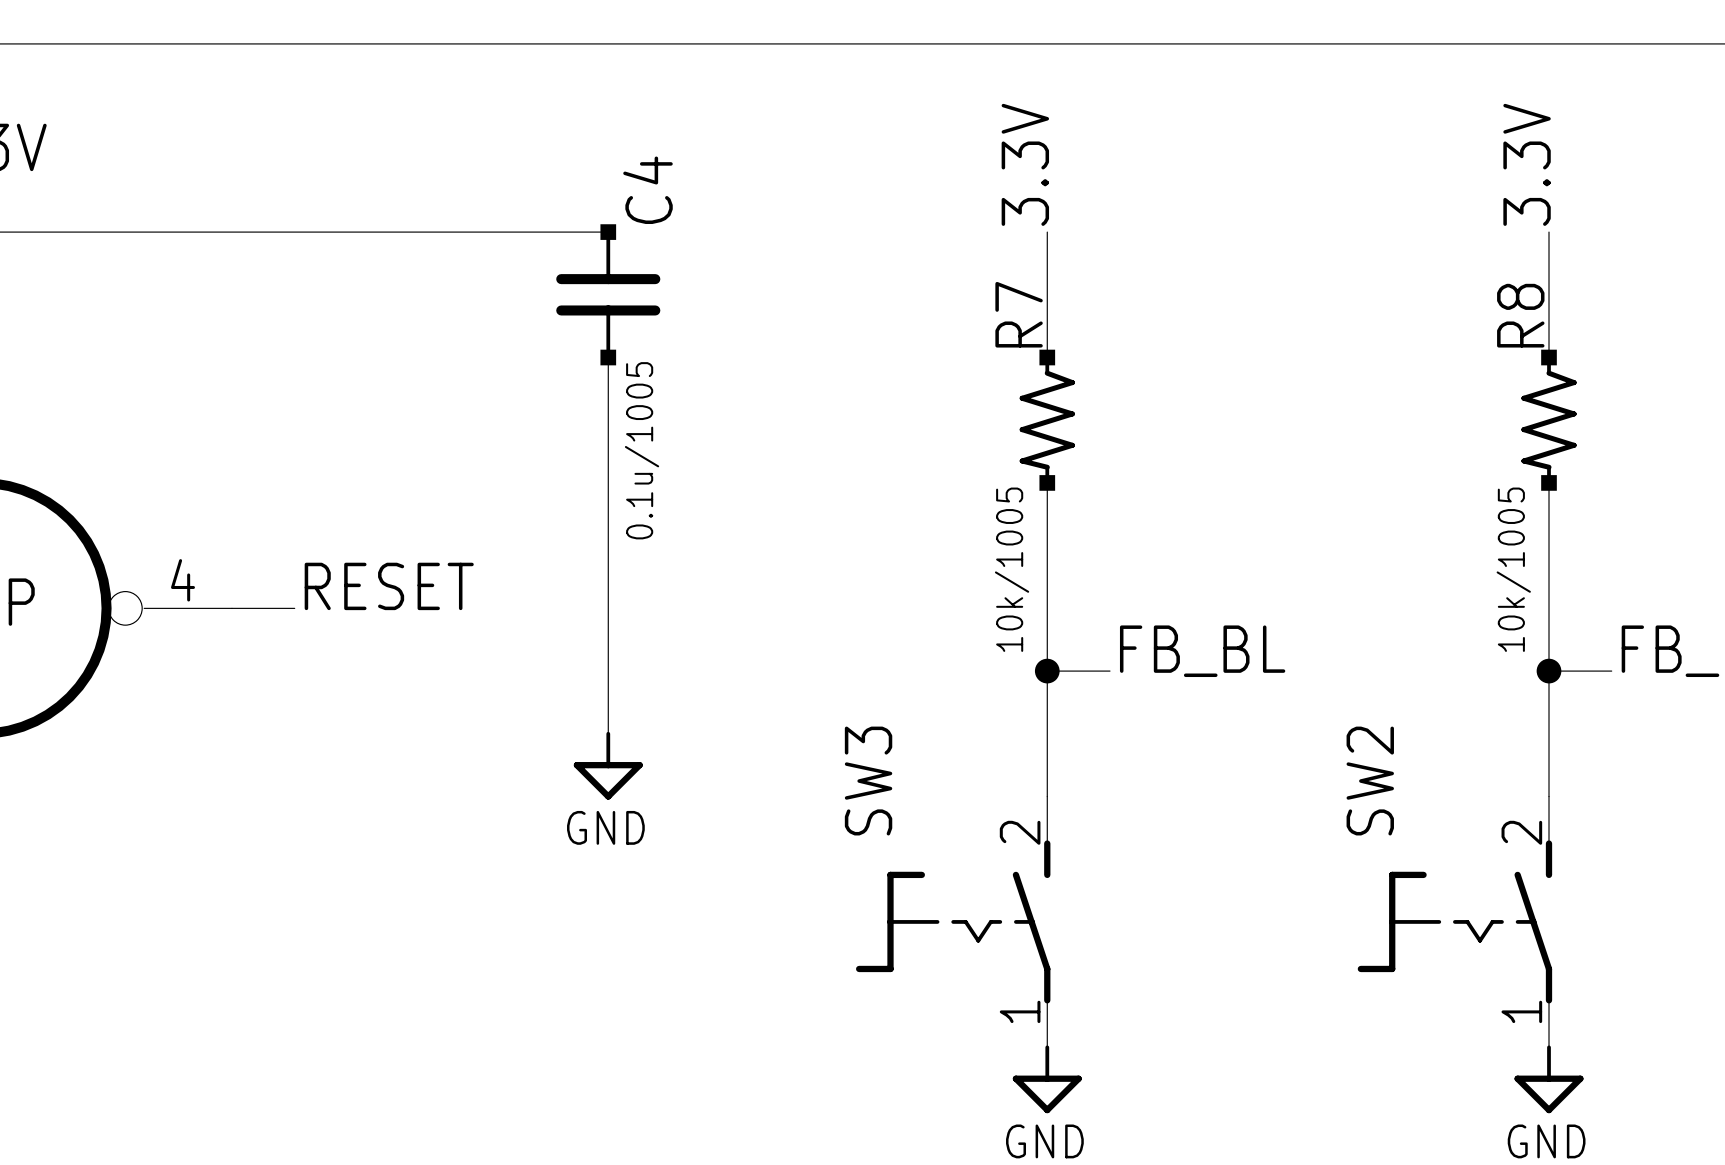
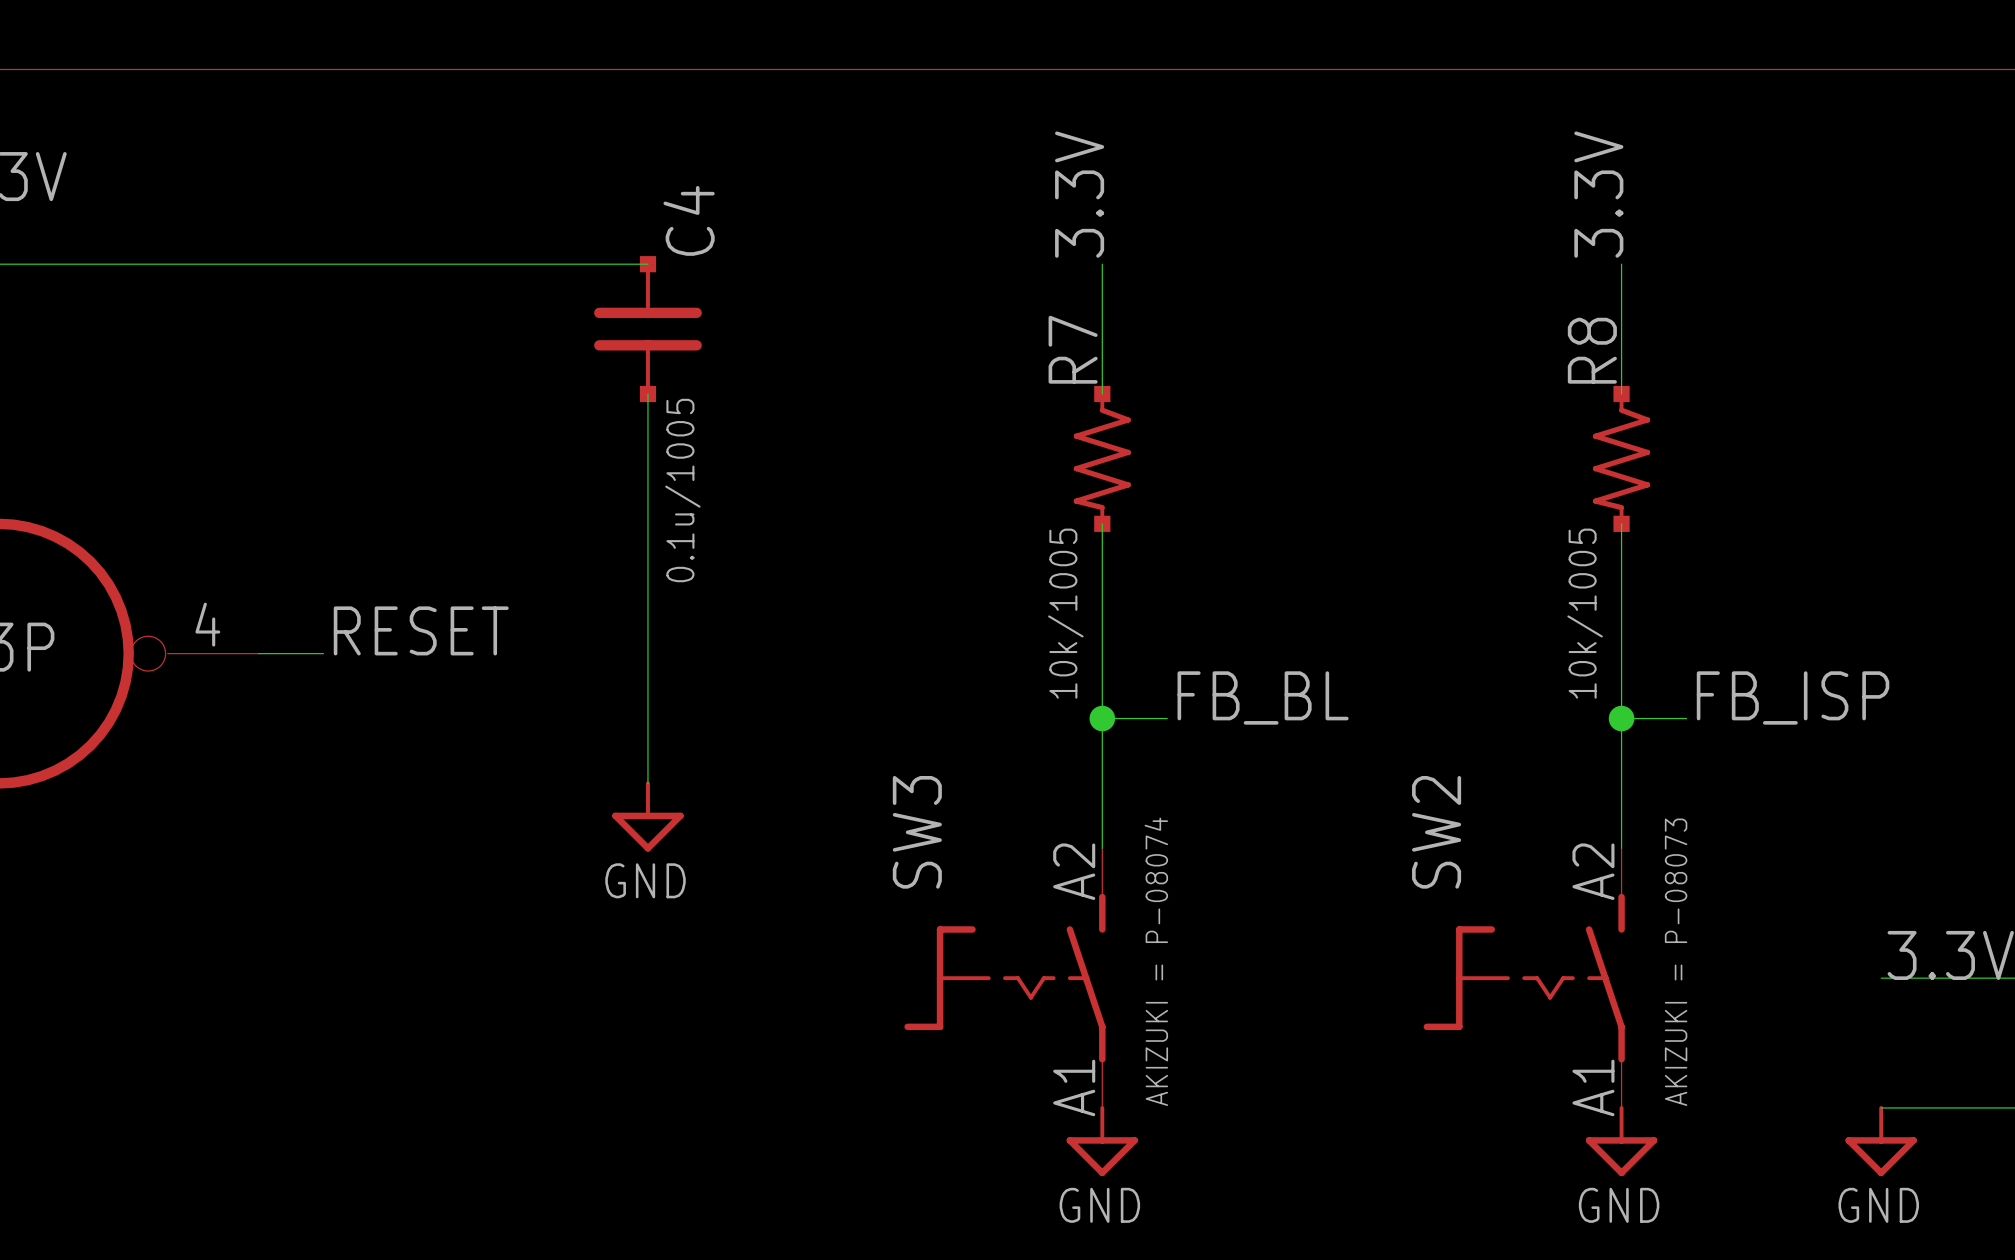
SW3 pin number: 2 (1020, 832) -> A2 (1074, 871)
SW2 pin number: 2 (1521, 832) -> A2 (1593, 871)
SW3 text: none -> AKIZUKI = P-08074 (1156, 961)
SW2 text: none -> AKIZUKI = P-08073 (1676, 962)
SW3 pin number: 1 (1020, 1011) -> A1 (1074, 1087)
SW2 pin number: 1 (1521, 1011) -> A1 (1593, 1087)

